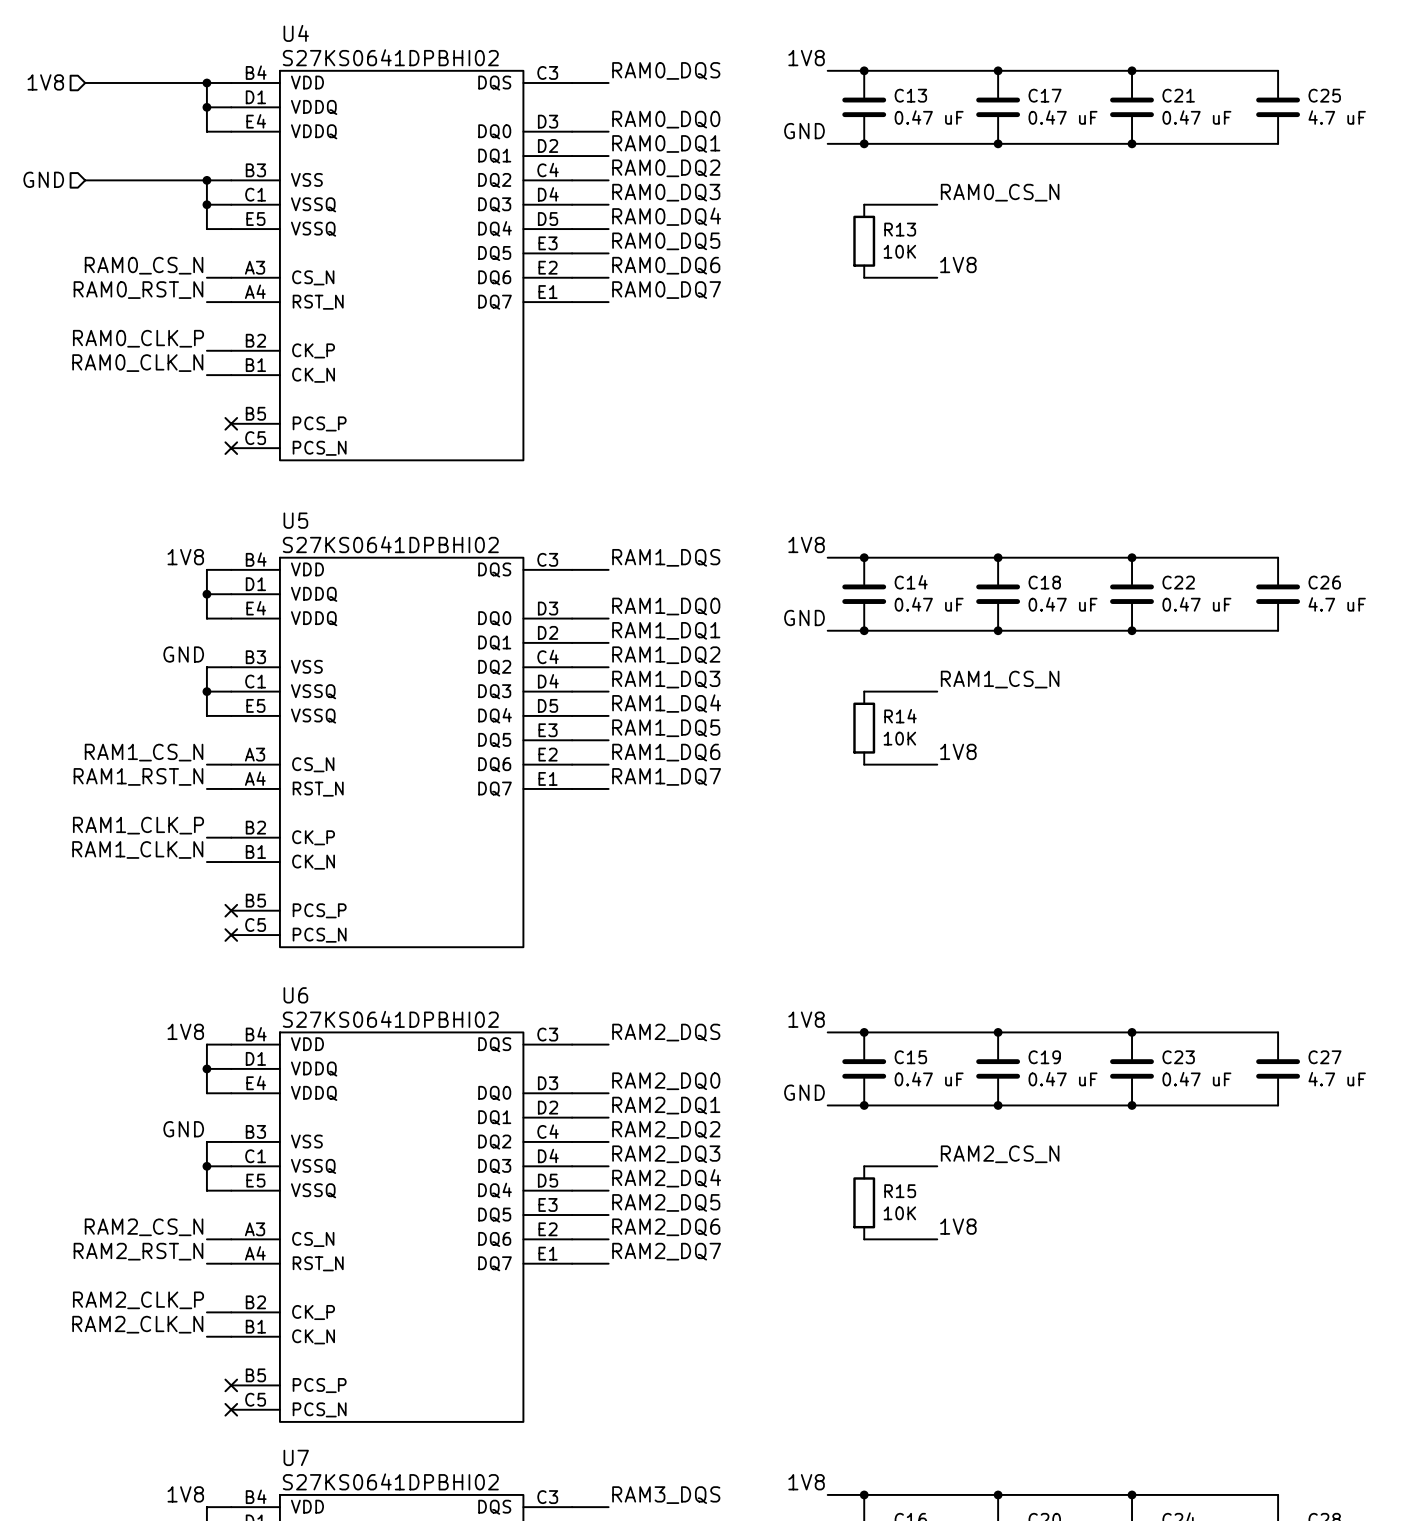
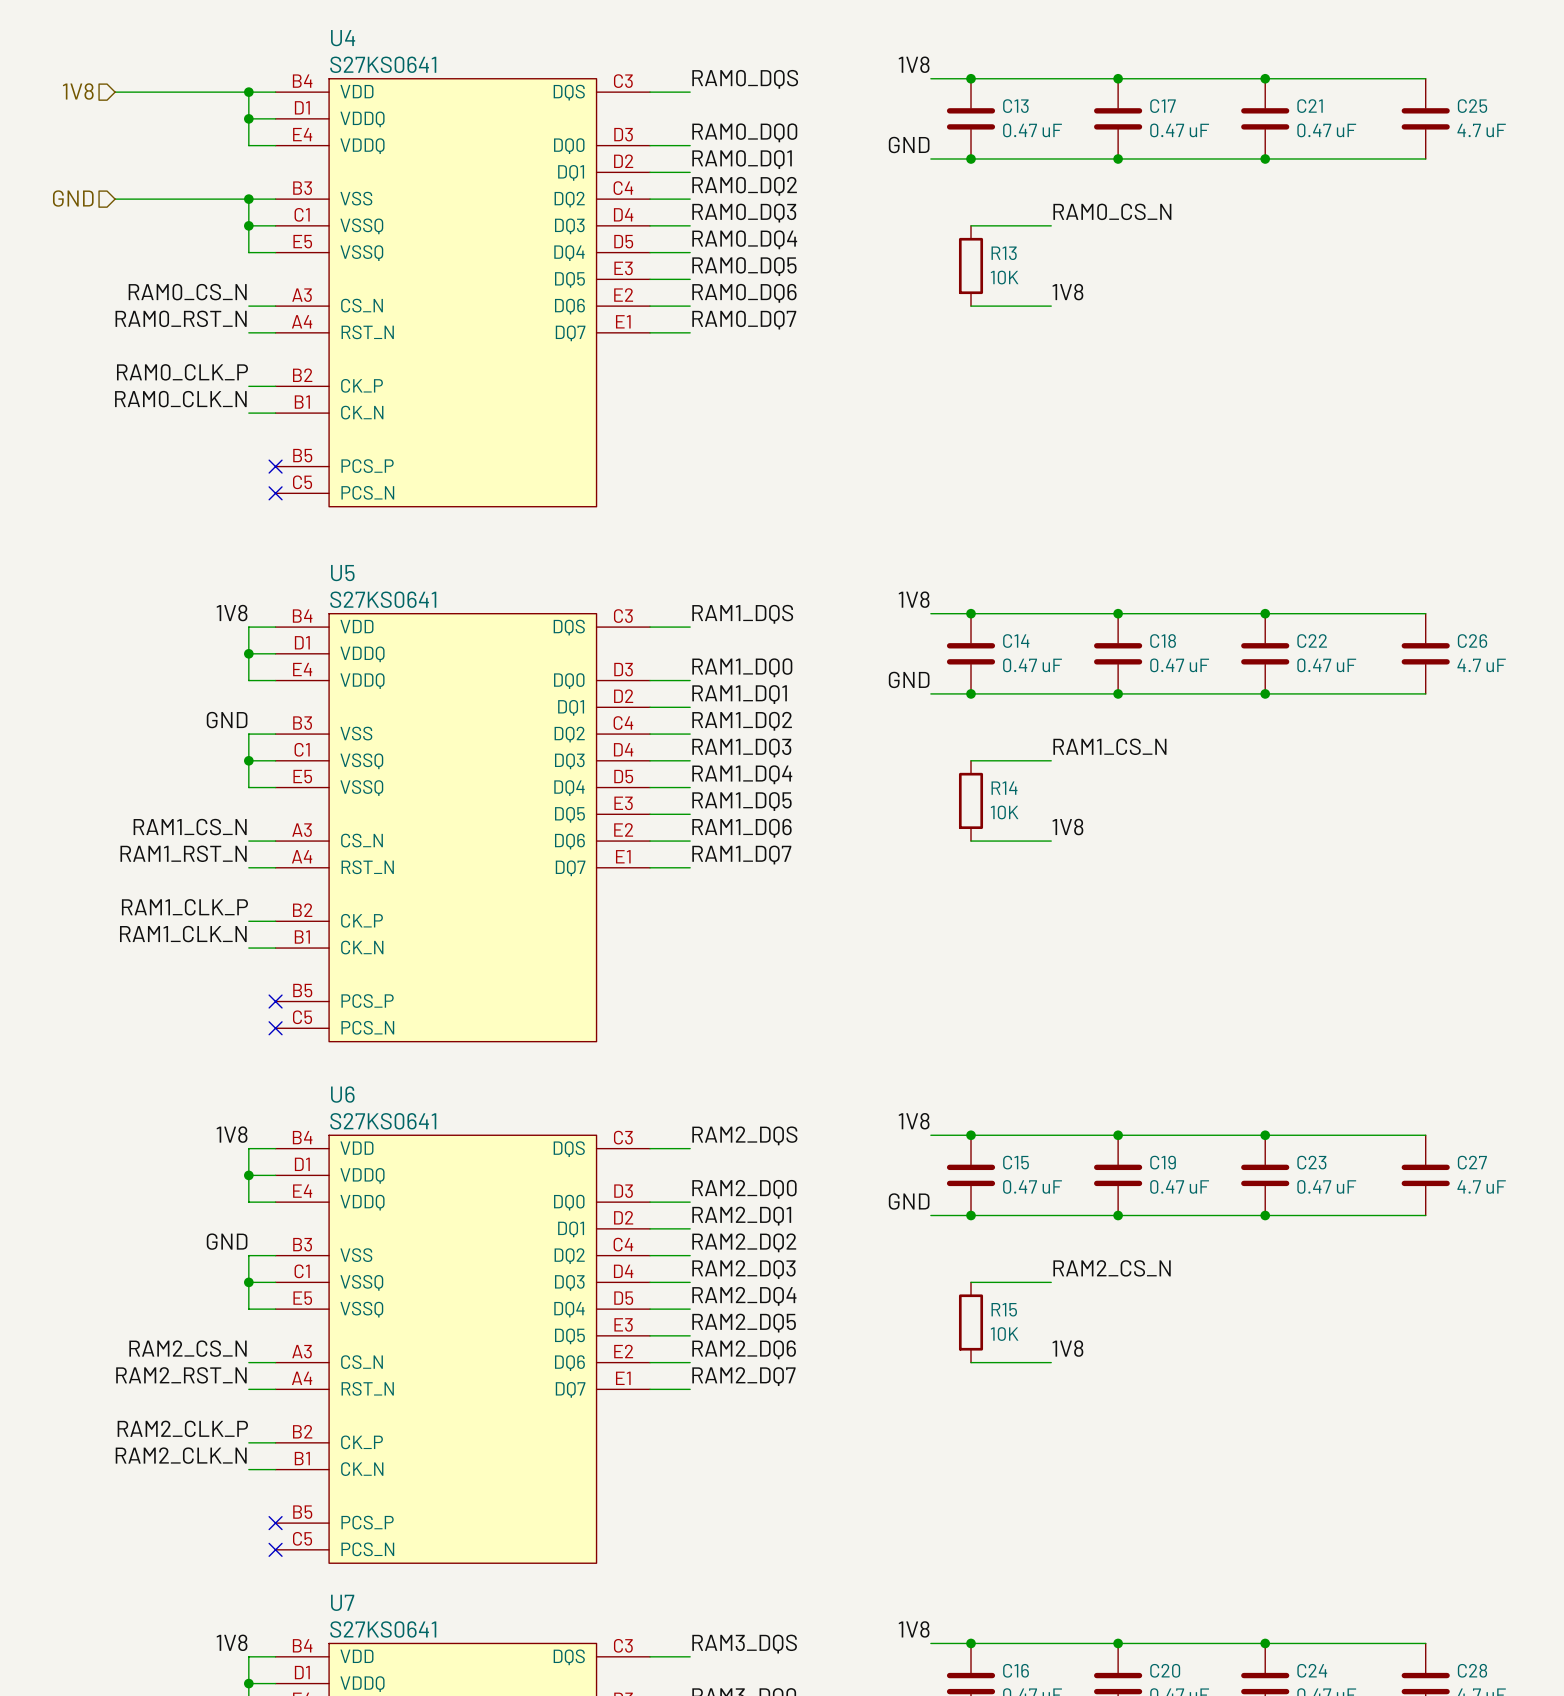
U4 value: S27KS0641DPBHI02 (390, 57) -> S27KS0641 (383, 64)
U5 value: S27KS0641DPBHI02 (390, 544) -> S27KS0641 (383, 599)
U6 value: S27KS0641DPBHI02 (390, 1019) -> S27KS0641 (383, 1121)
U7 value: S27KS0641DPBHI02 (390, 1481) -> S27KS0641 (383, 1629)

